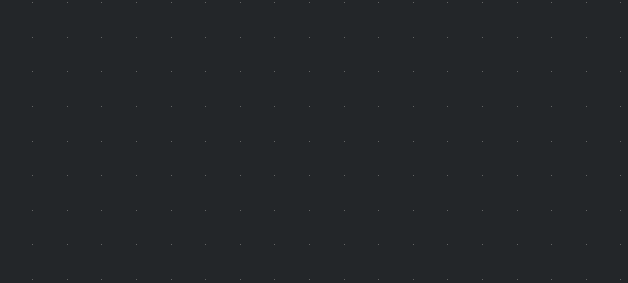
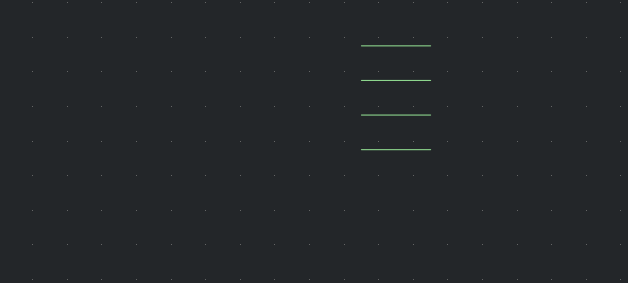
wire: none -> (361, 45) (430, 45)
wire: none -> (361, 80) (430, 80)
wire: none -> (361, 115) (430, 115)
wire: none -> (361, 149) (430, 149)

